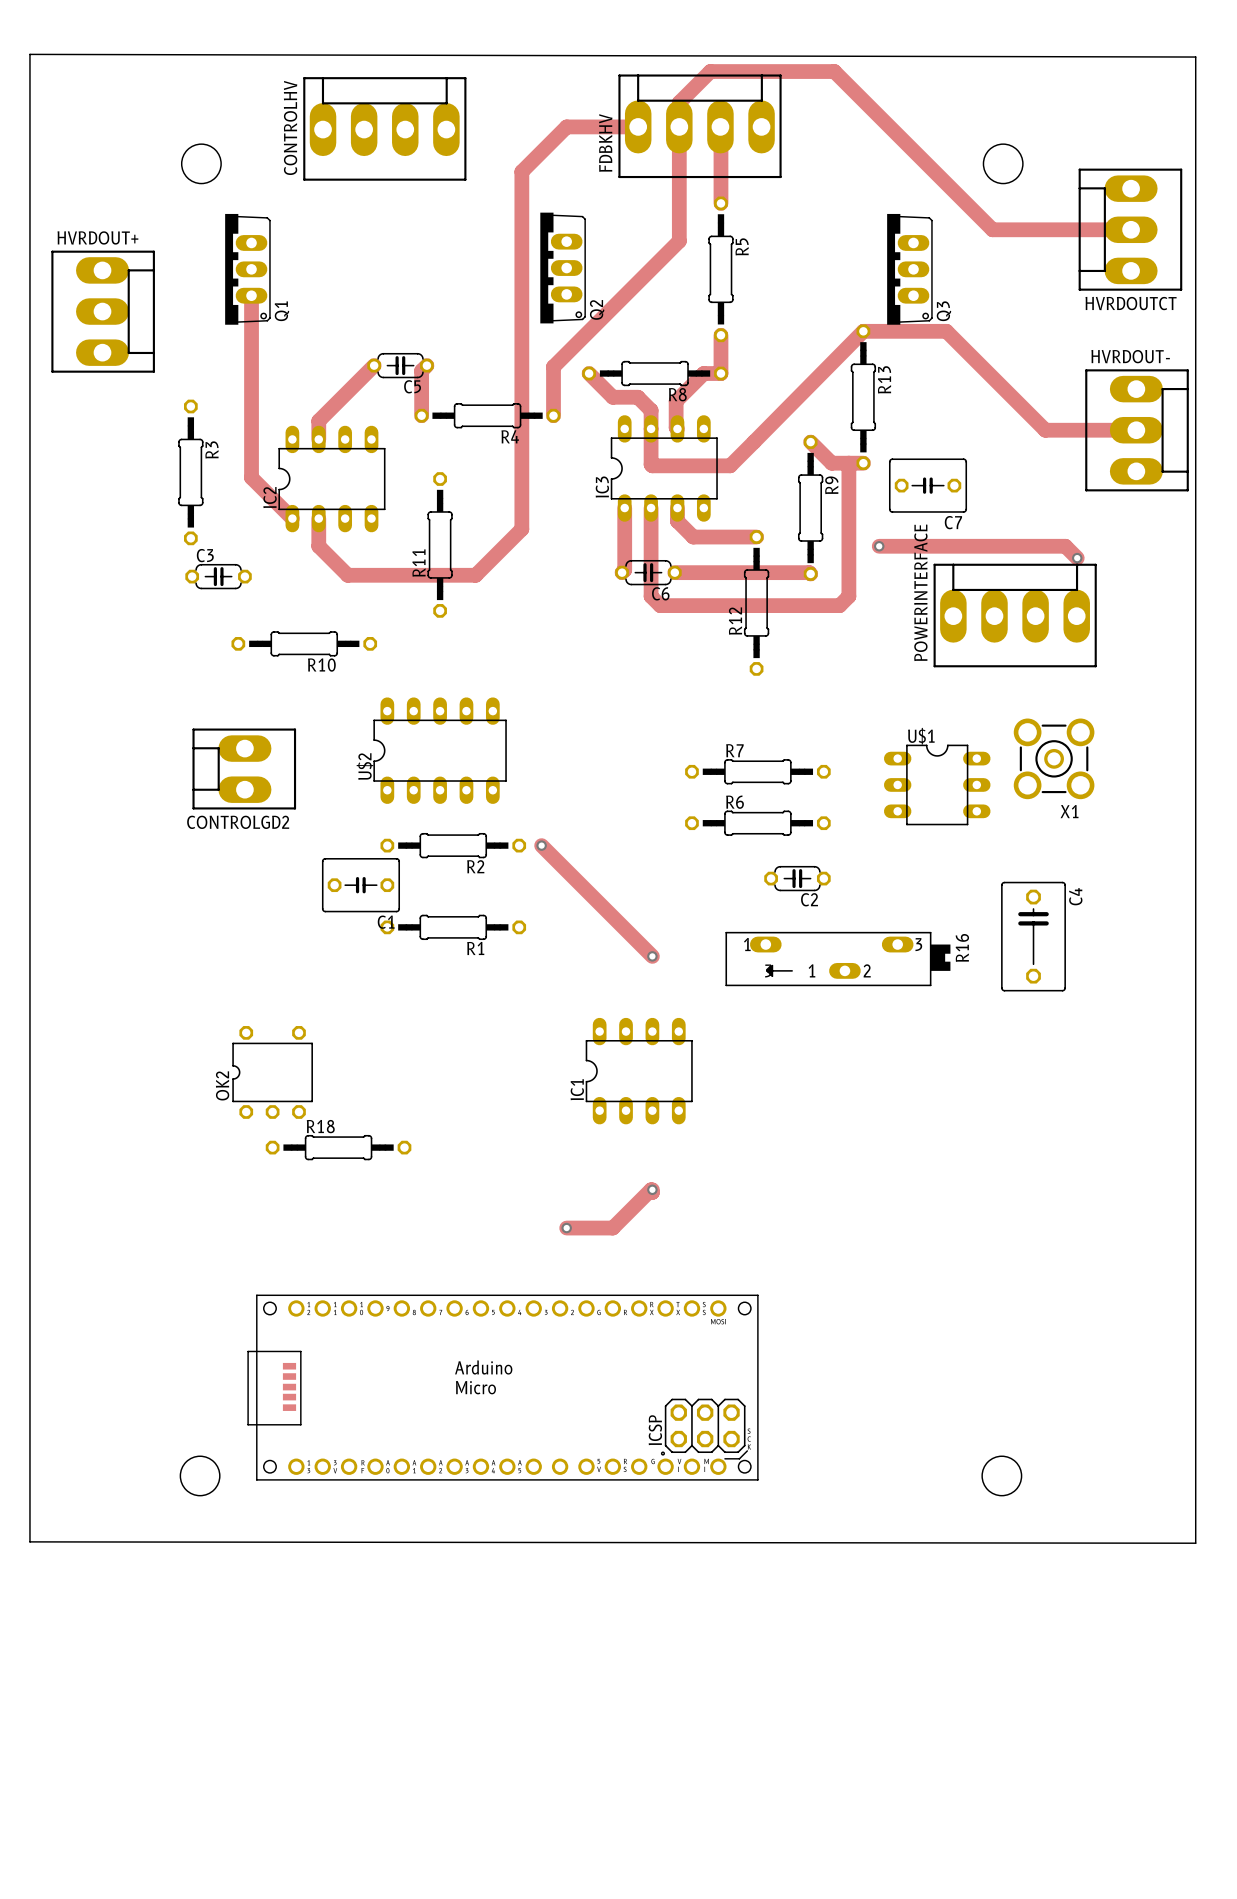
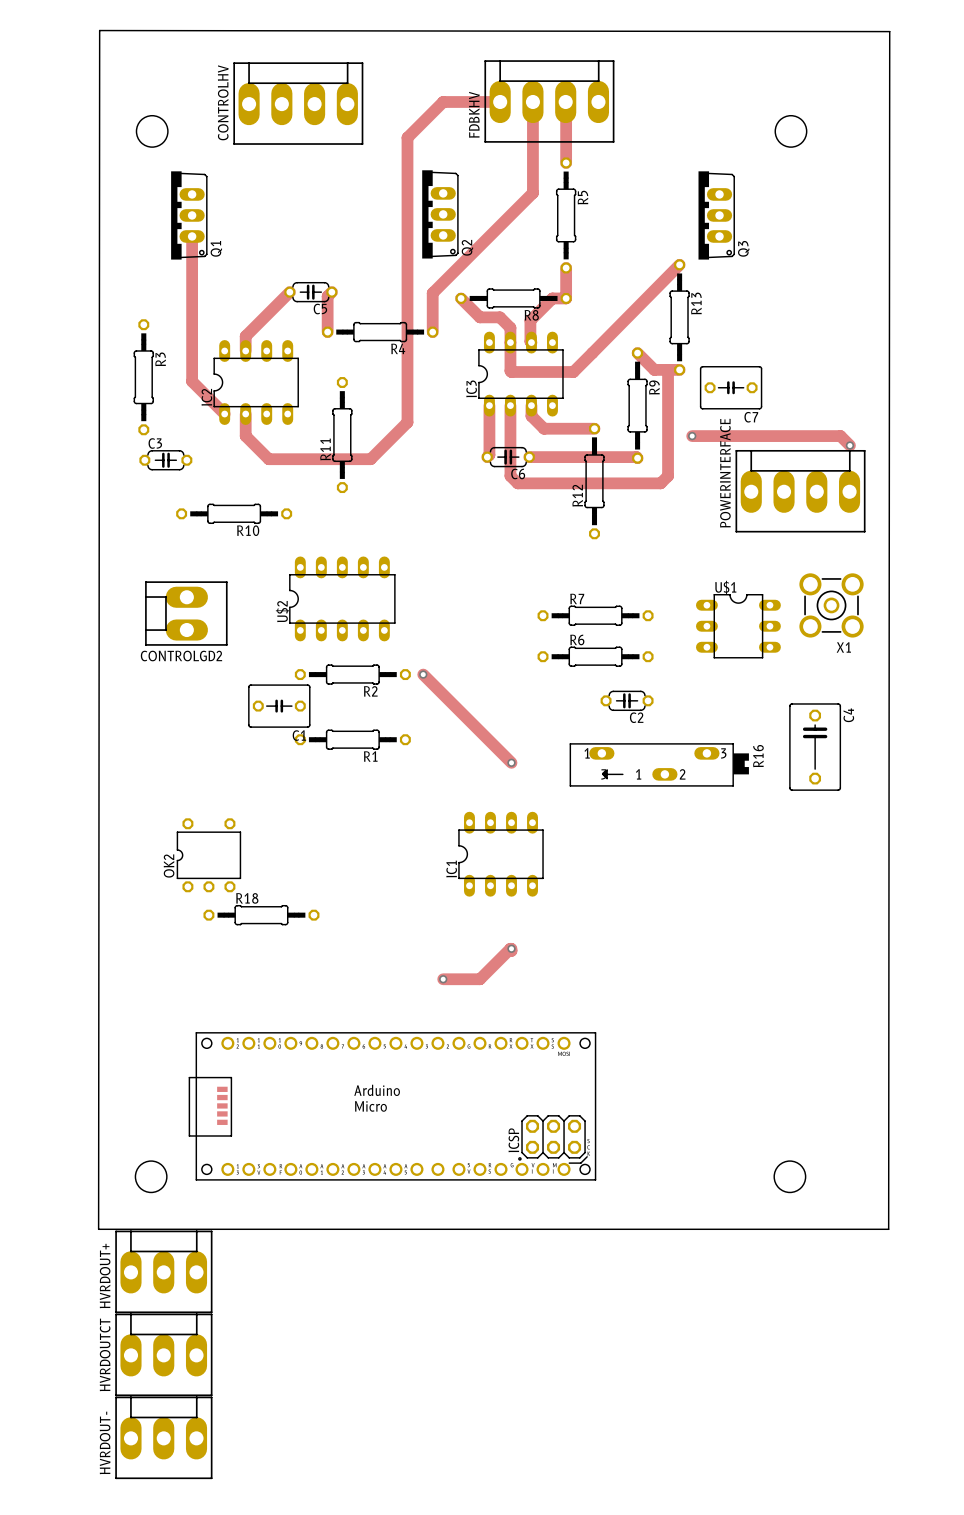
board edge: (29, 54) (1195, 57) (1195, 1543) (29, 1541) (29, 54) -> (99, 30) (98, 1229) (888, 1229) (889, 31) (99, 30)
track: (679, 126) (679, 102) (710, 71) (834, 71) (992, 229) (1131, 229) -> none
HVRDOUTCT: (1130, 229) -> none
HVRDOUT+: (103, 311) -> none
track: (863, 331) (946, 331) (1045, 430) (1136, 430) -> none
HVRDOUT-: (1137, 430) -> none
HVRDOUT+: none -> (163, 1271)
HVRDOUTCT: none -> (163, 1354)
HVRDOUT-: none -> (163, 1437)

